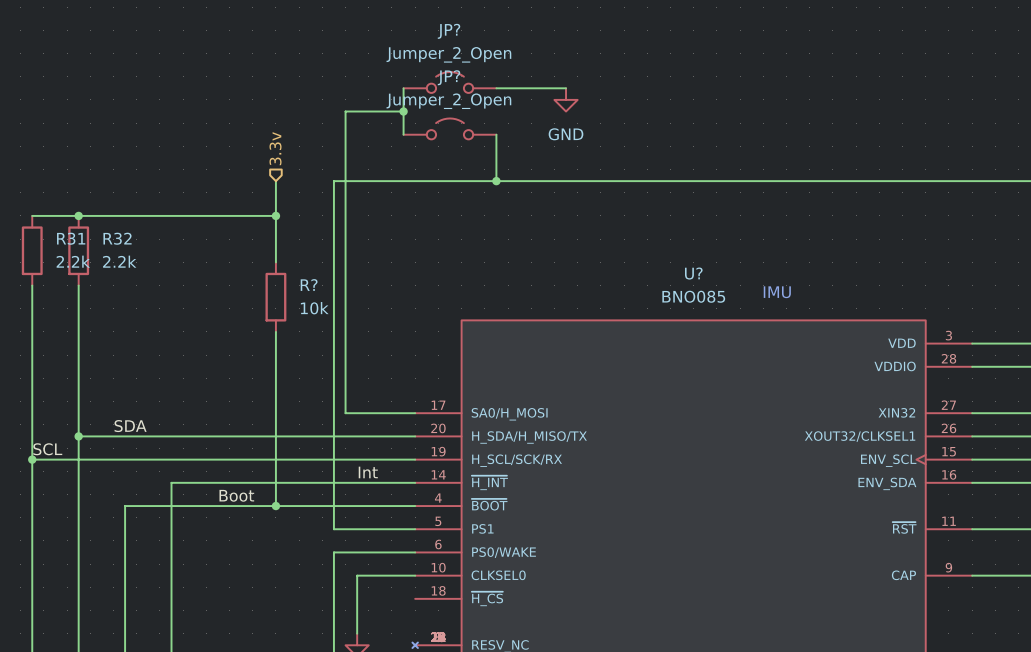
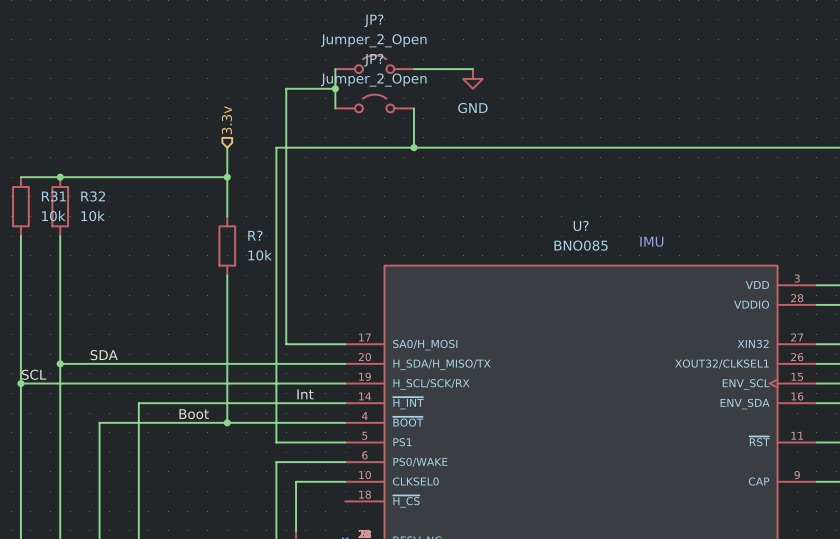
R31 value: 2.2k (73, 261) -> 10k (53, 216)
R32 value: 2.2k (119, 261) -> 10k (93, 216)

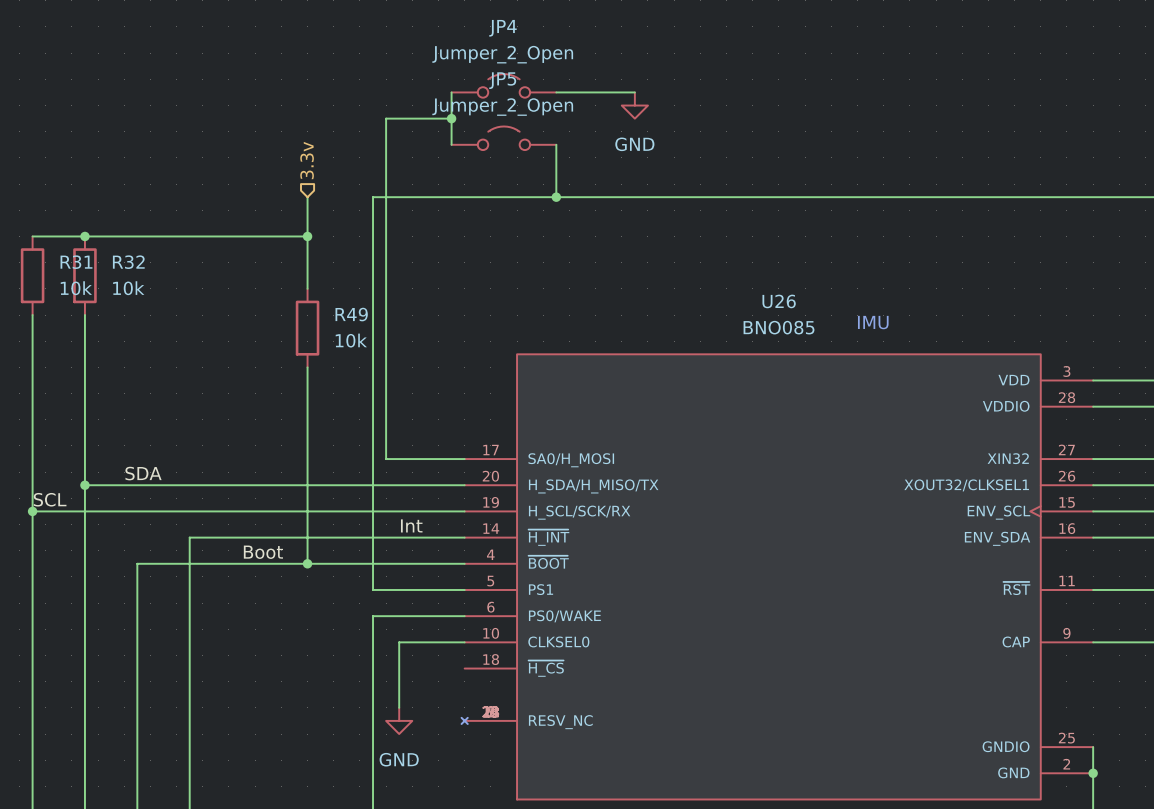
JP? name: JP? (373, 20) -> JP4 (502, 28)
JP? name: JP? (373, 60) -> JP5 (502, 80)
U? name: U? (581, 225) -> U26 (779, 301)
R? name: R? (255, 235) -> R49 (351, 314)

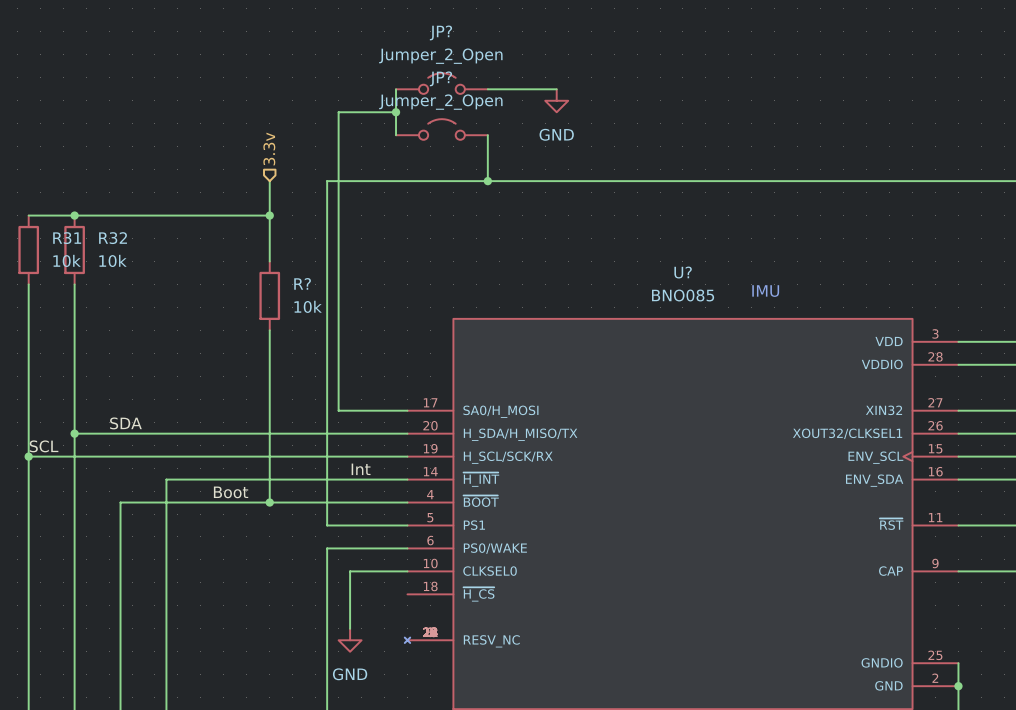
JP4 name: JP4 (502, 28) -> JP? (440, 32)
JP5 name: JP5 (502, 80) -> JP? (440, 78)
U26 name: U26 (779, 301) -> U? (683, 272)
R49 name: R49 (351, 314) -> R? (302, 283)

